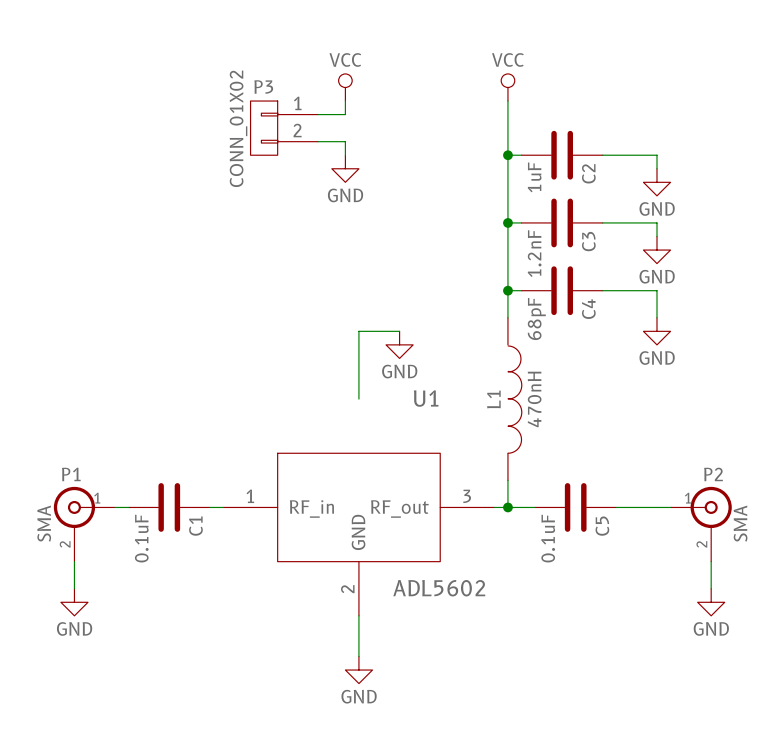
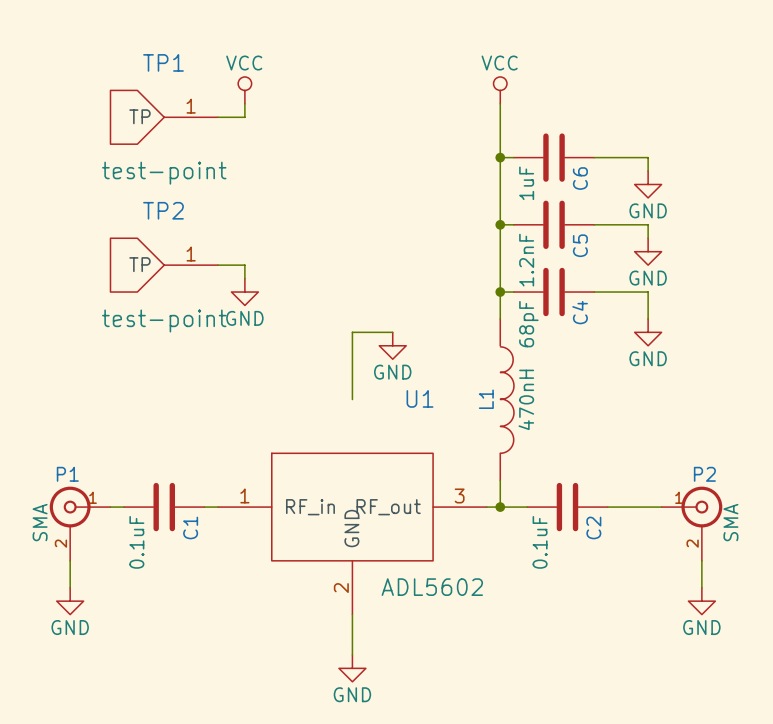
power symbol position: VCC (345, 87) -> VCC (244, 90)
wire: (345, 101) (345, 114) (318, 114) -> (244, 103) (244, 117) (218, 117)
TP1: none -> test-point (164, 117)
P3: CONN_01X02 (284, 128) -> none
wire: (318, 141) (345, 141) (345, 155) -> (218, 265) (244, 265) (244, 278)
power symbol position: GND (345, 168) -> GND (244, 292)
C2 name: C2 (588, 173) -> C6 (580, 178)
C3 name: C3 (588, 241) -> C5 (580, 245)
TP2: none -> test-point (164, 265)
C5 name: C5 (602, 526) -> C2 (593, 527)

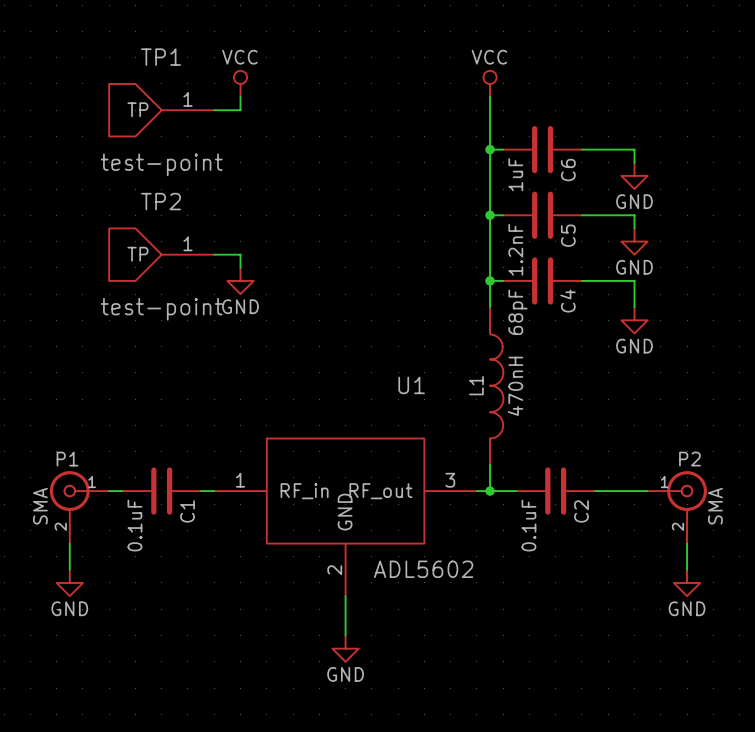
wire: (392, 332) (352, 332) (352, 399) -> none
power symbol: GND (392, 345) -> none

